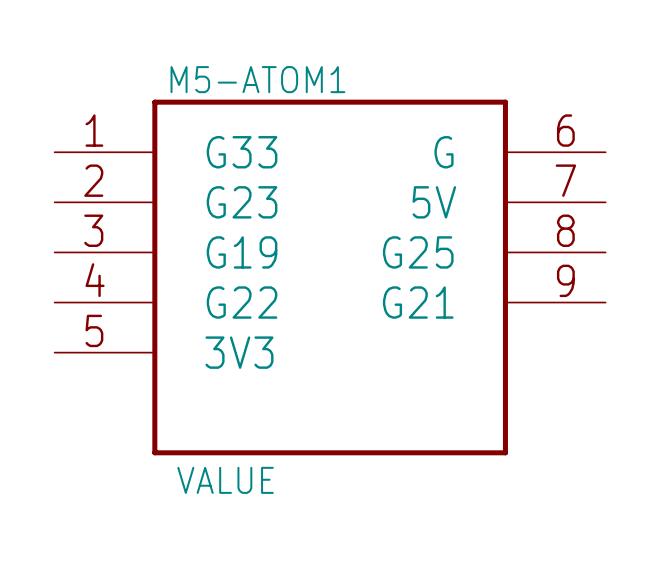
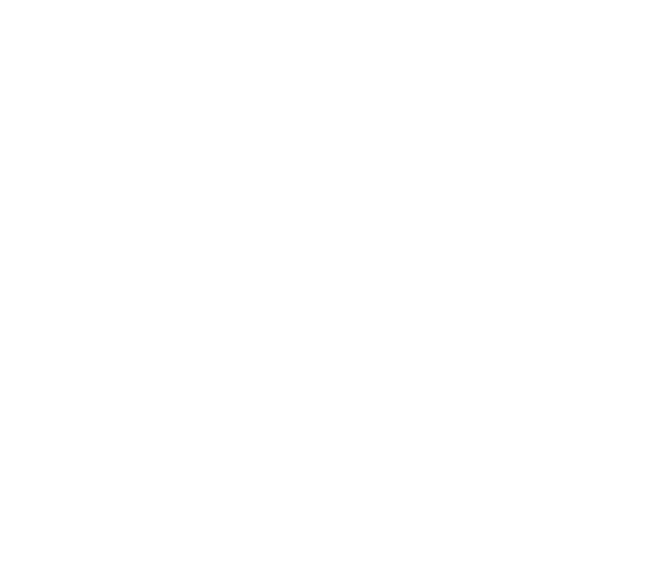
M5-ATOM1: (330, 277) -> none

